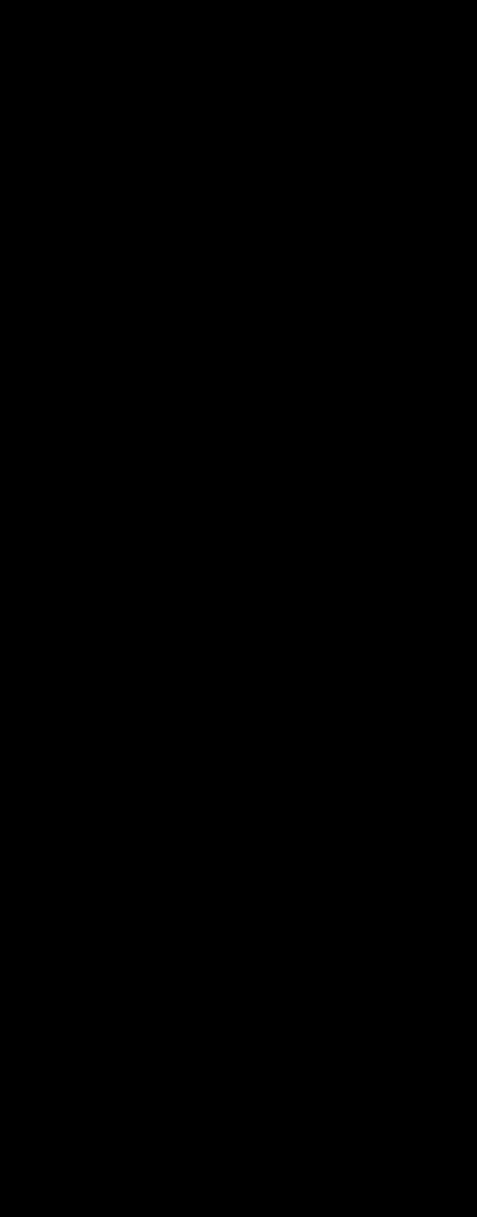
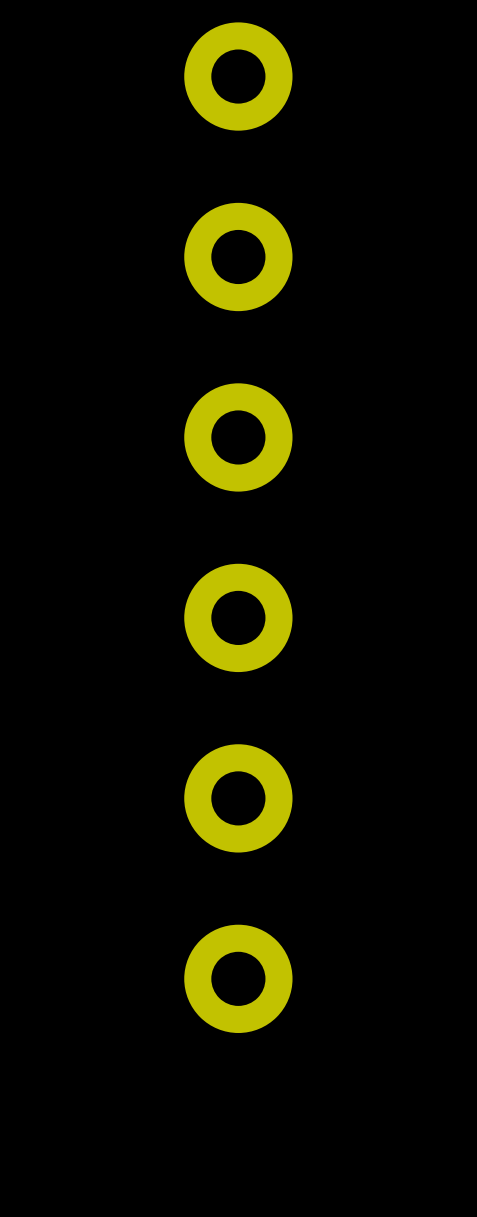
part: none -> (238, 527)

